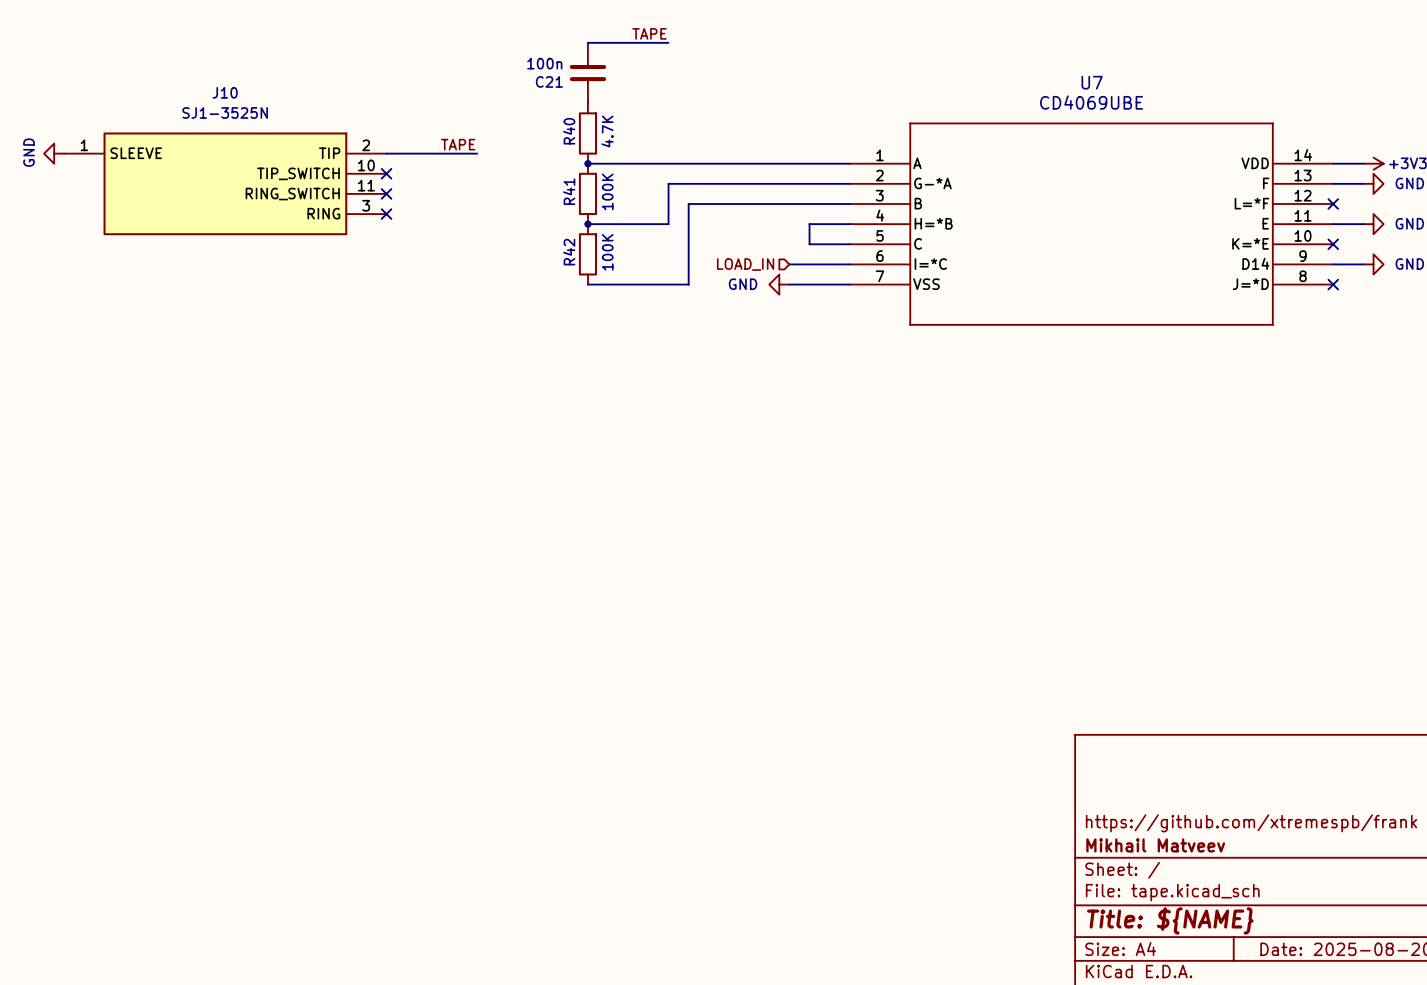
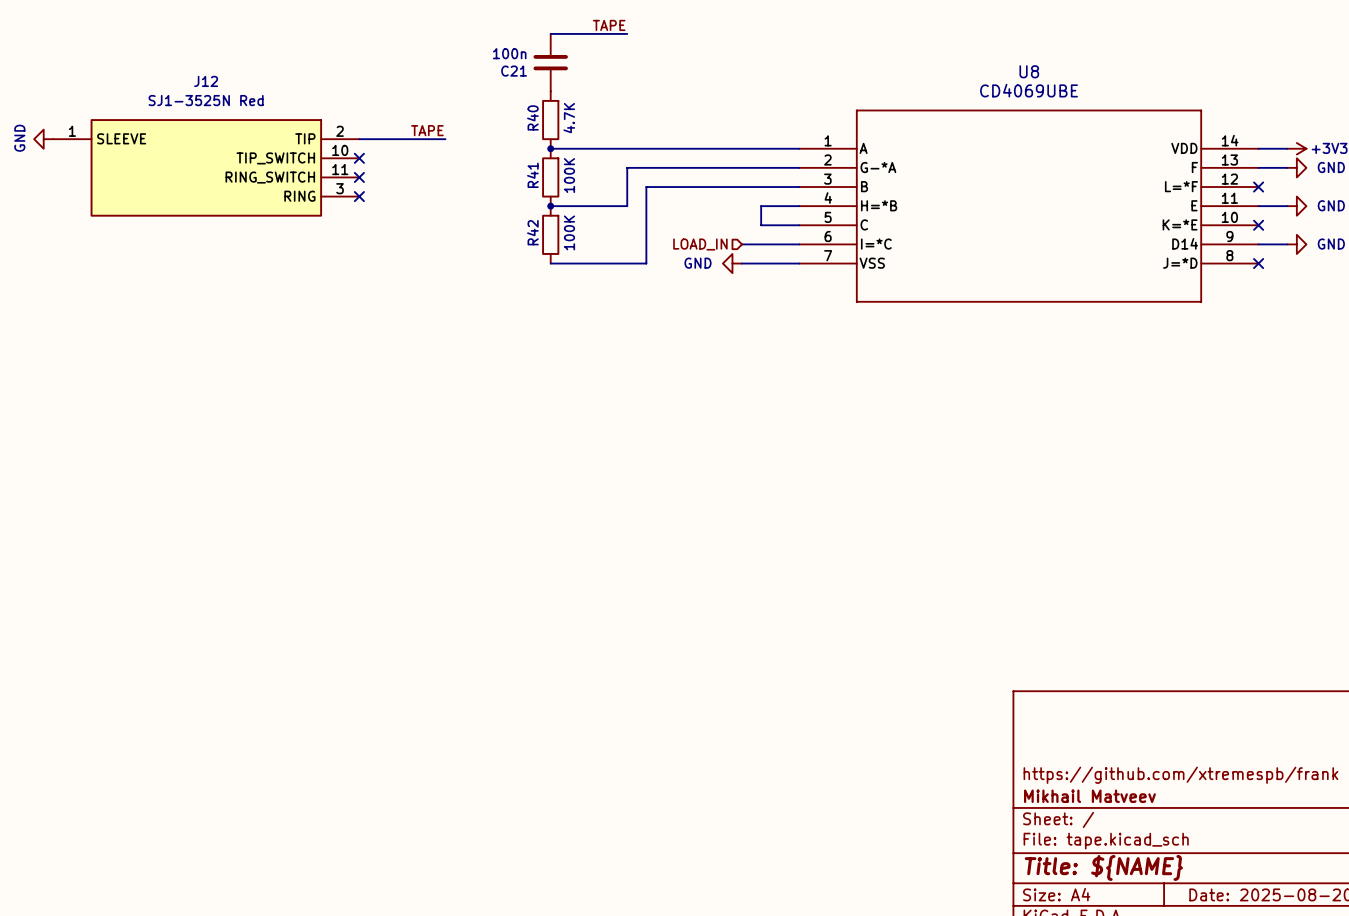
U7 name: U7 (1092, 82) -> U8 (1029, 71)
J10 name: J10 (225, 92) -> J12 (206, 81)
J10 value: SJ1-3525N (225, 112) -> SJ1-3525N Red (206, 100)

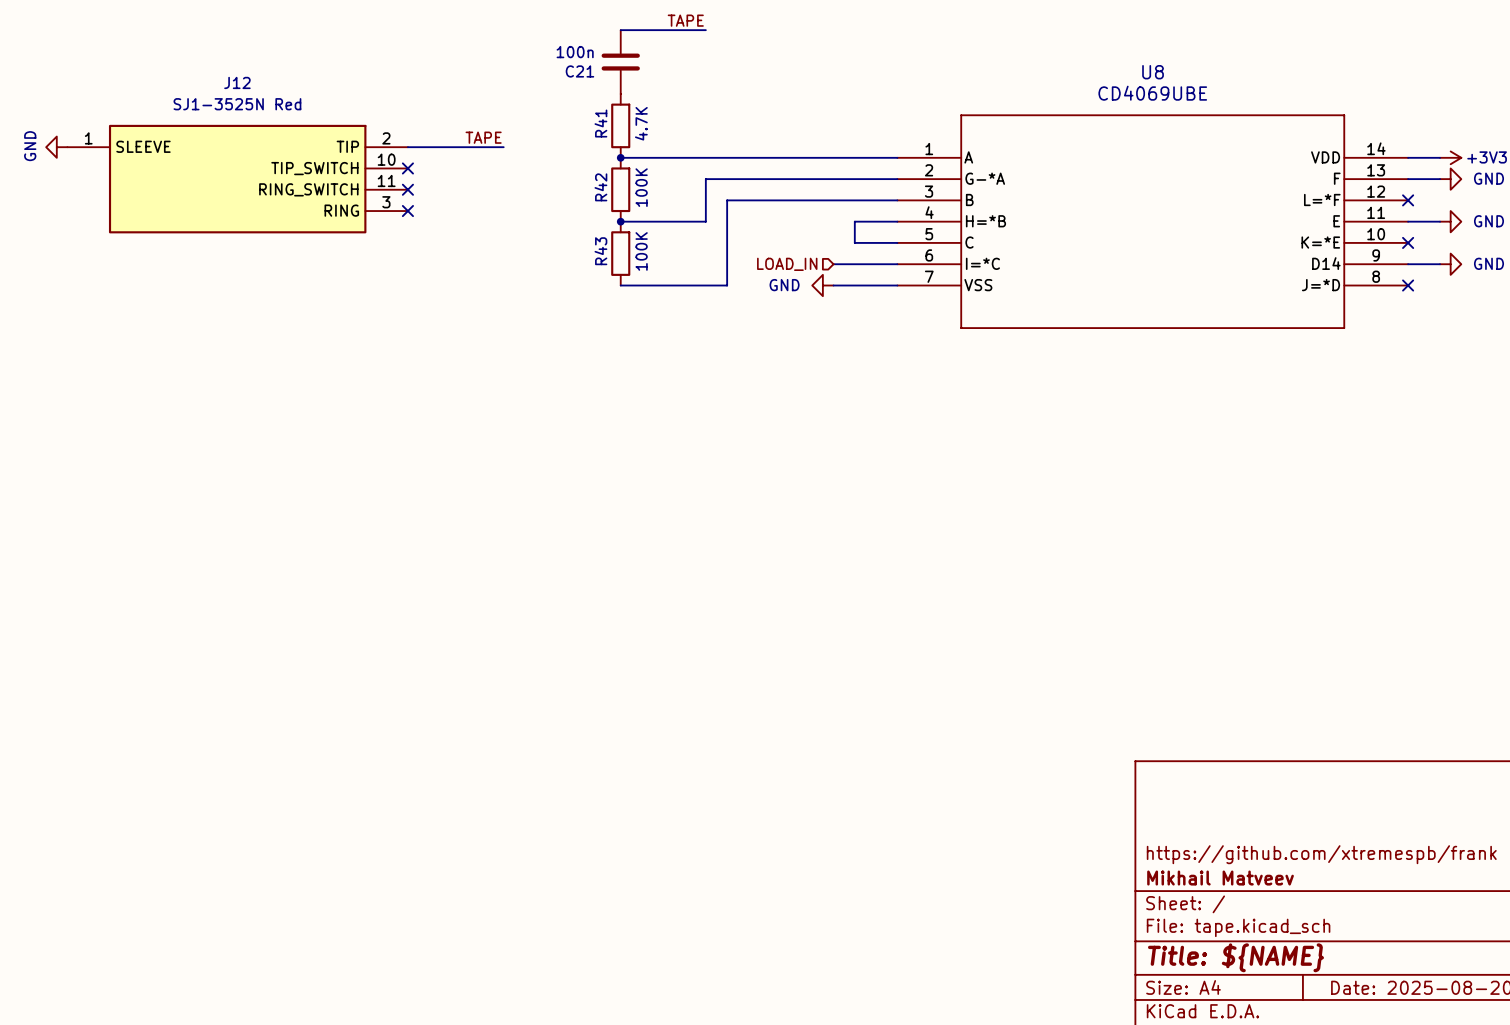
R40 name: R40 (532, 117) -> R41 (600, 123)
R41 name: R41 (532, 175) -> R42 (600, 187)
R42 name: R42 (532, 232) -> R43 (600, 251)

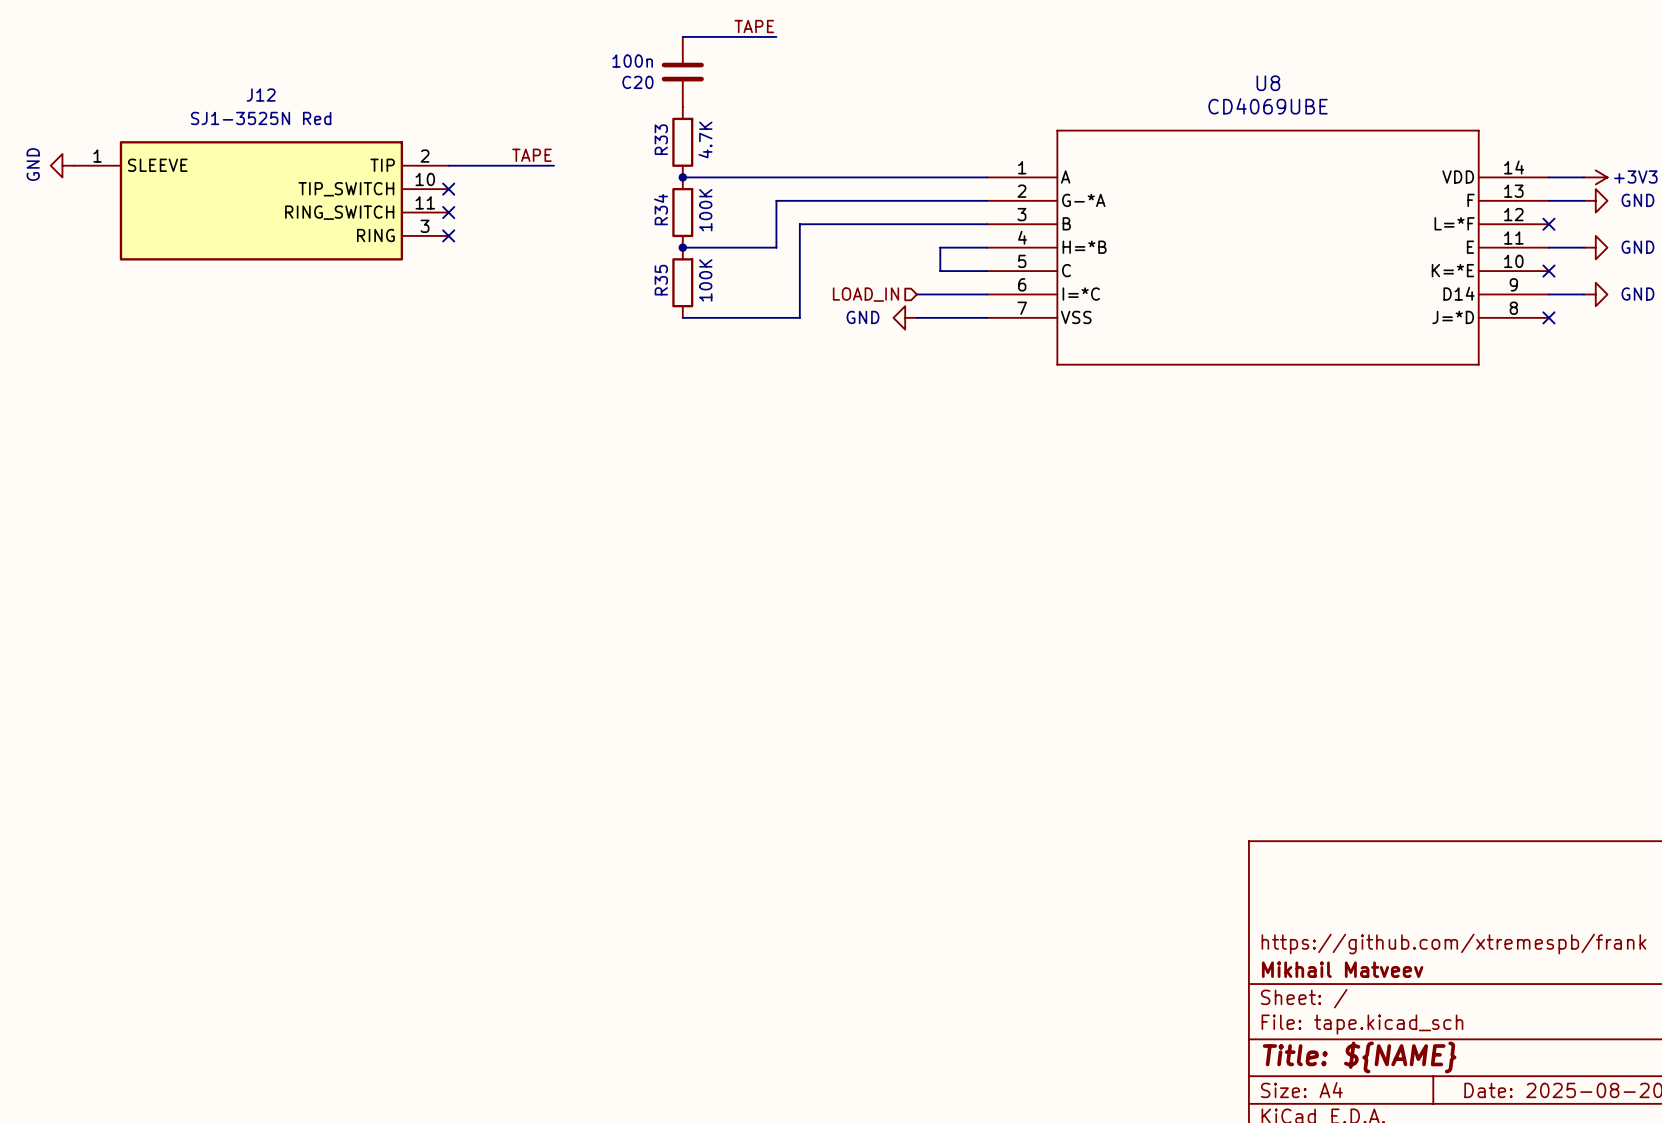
C21 name: C21 (579, 71) -> C20 (637, 82)
R41 name: R41 (600, 123) -> R33 (661, 139)
R42 name: R42 (600, 187) -> R34 (661, 209)
R43 name: R43 (600, 251) -> R35 (661, 280)

